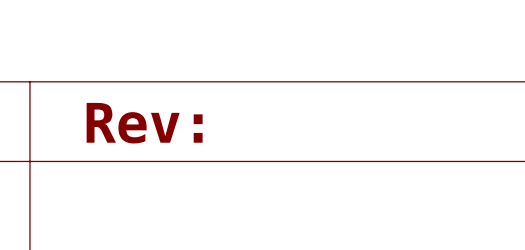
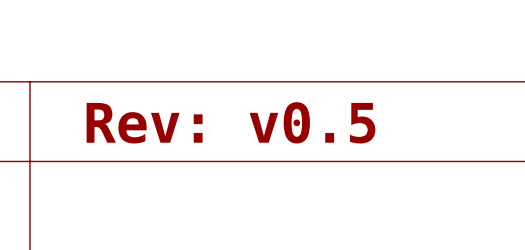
title block: Rev: (144, 123) -> Rev: v0.5 (230, 122)

